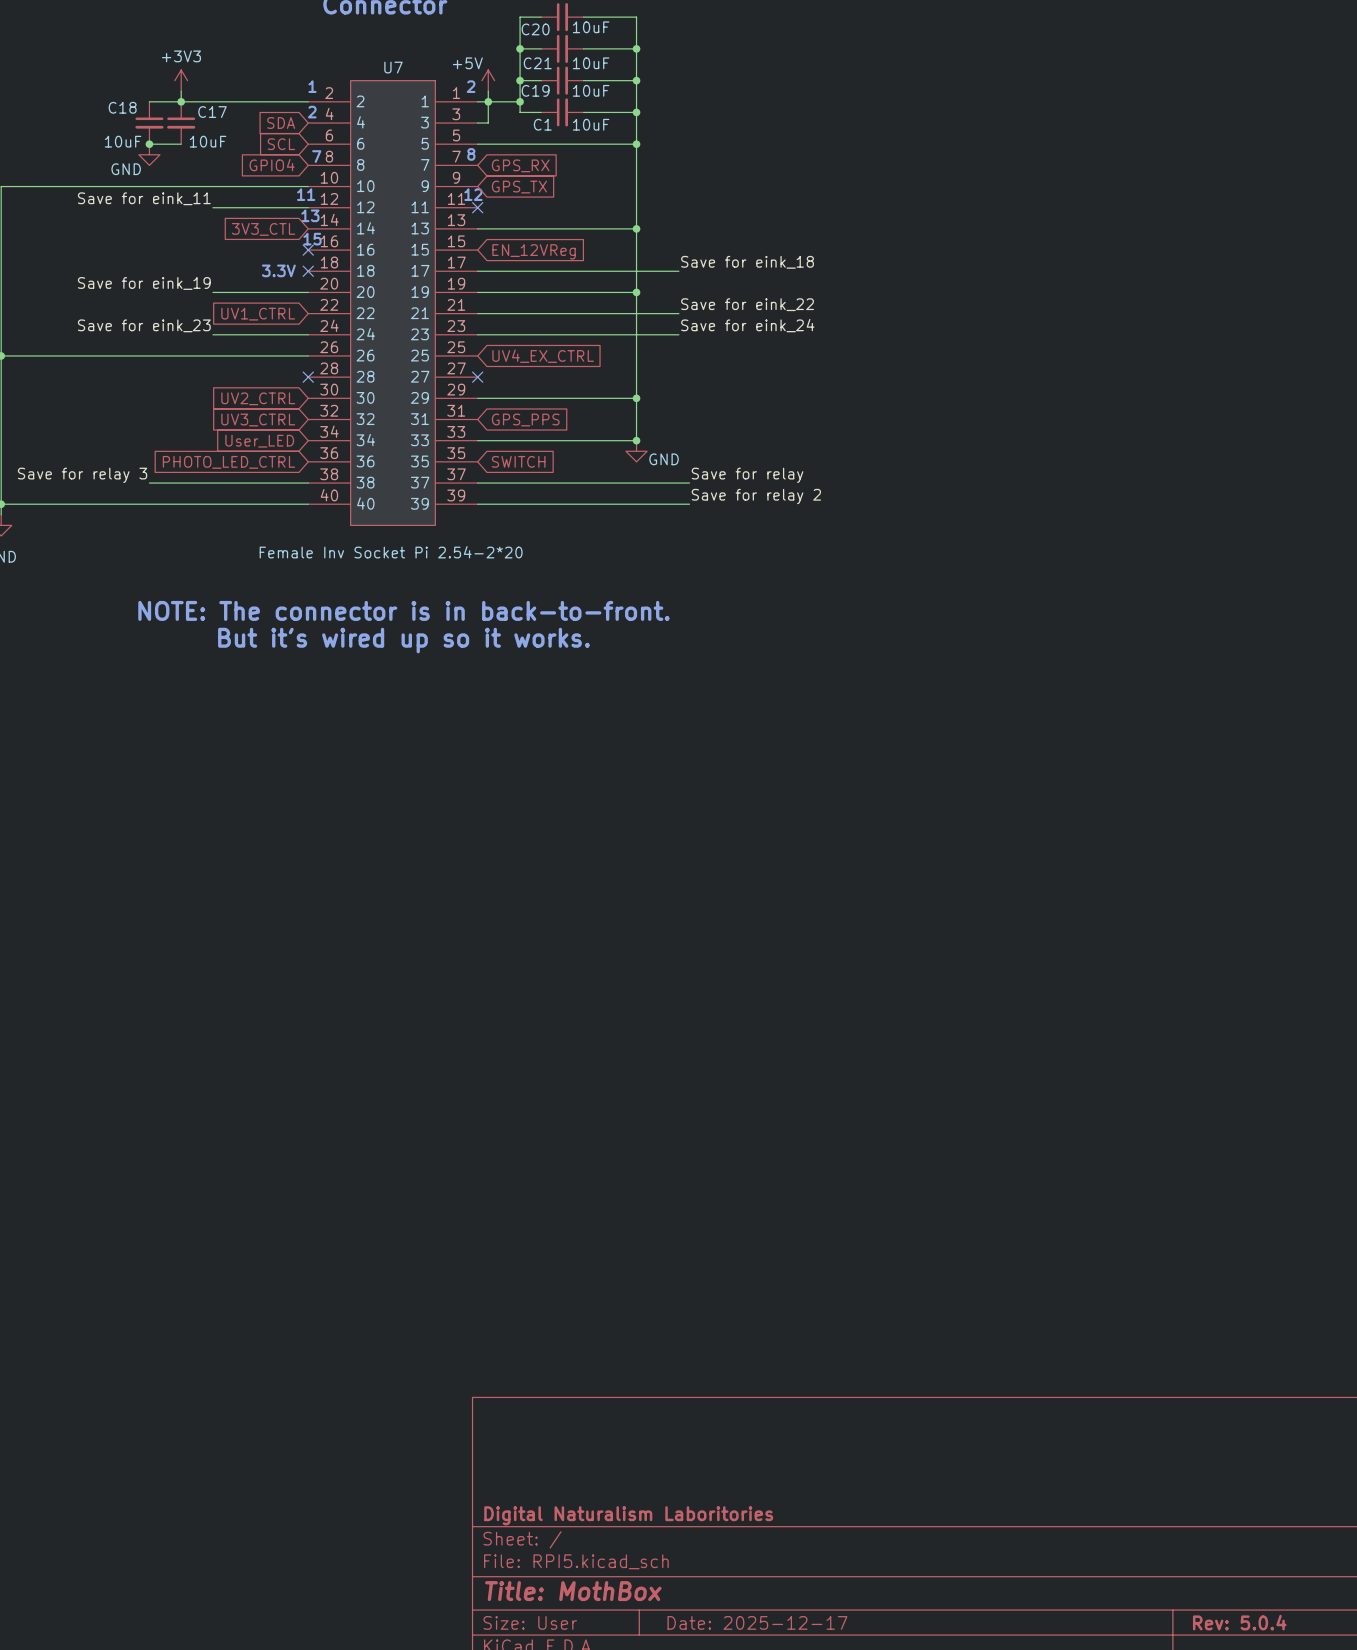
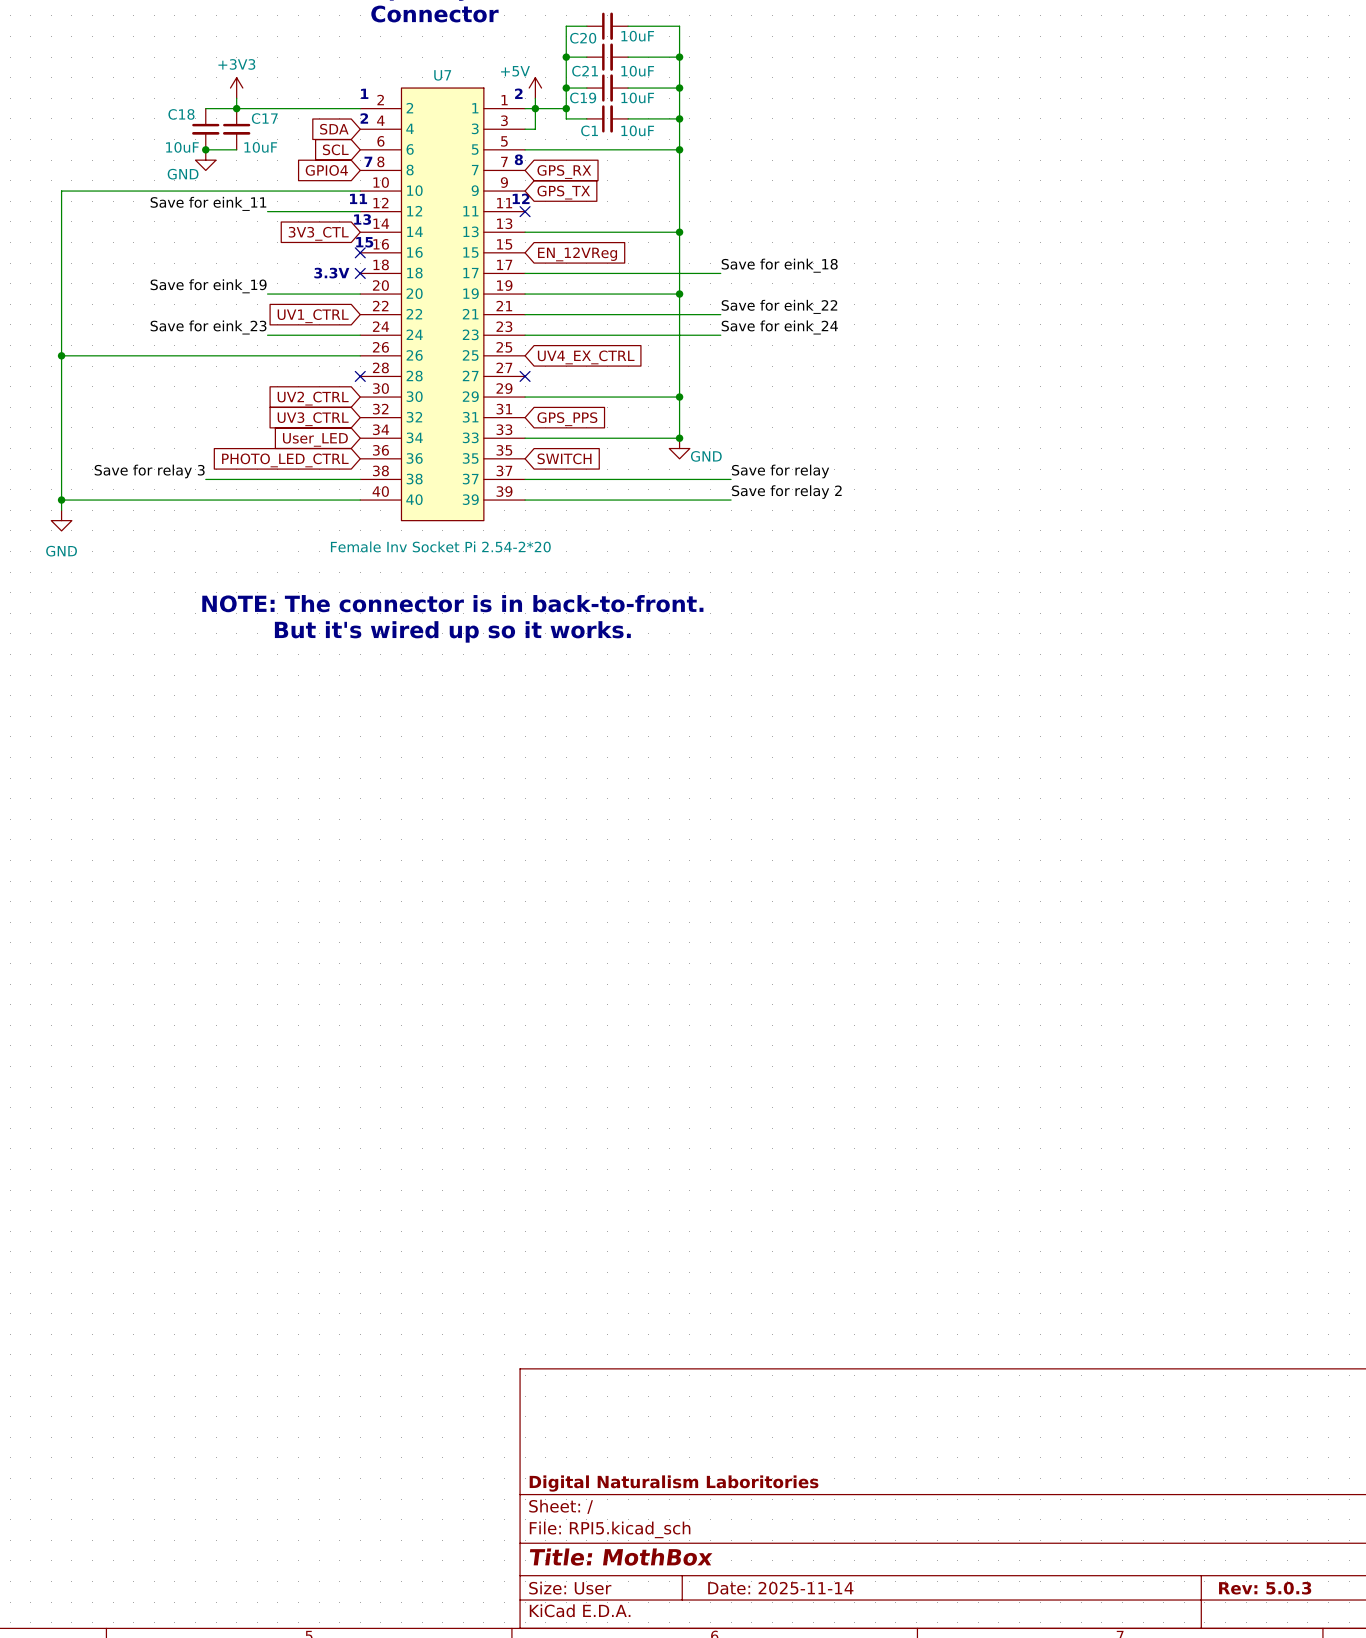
title block: Date: 2025-12-17 (757, 1622) -> Date: 2025-11-14 (780, 1588)
title block: Rev: 5.0.4 (1239, 1622) -> Rev: 5.0.3 (1265, 1588)

